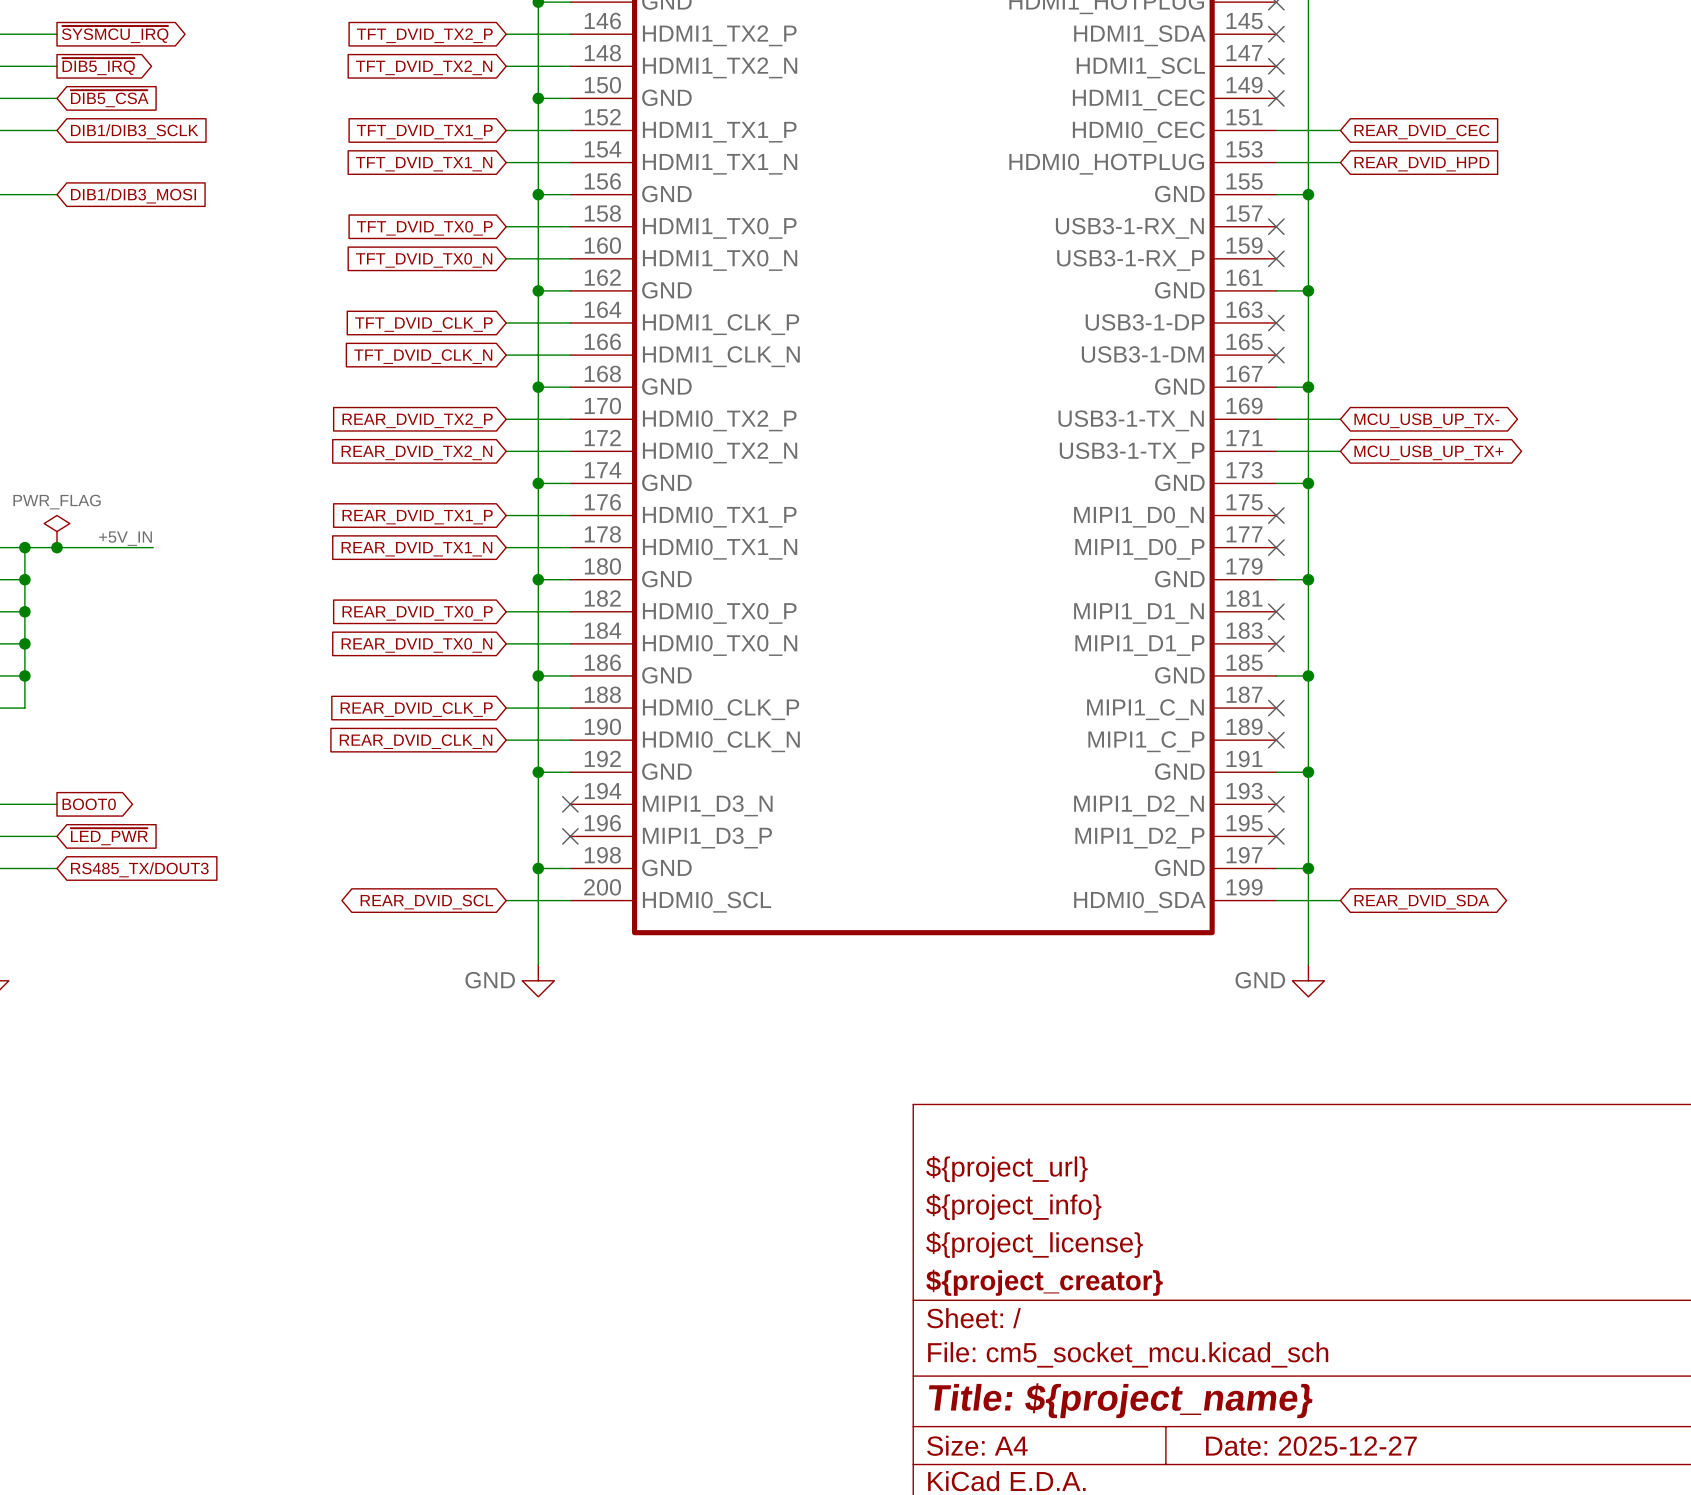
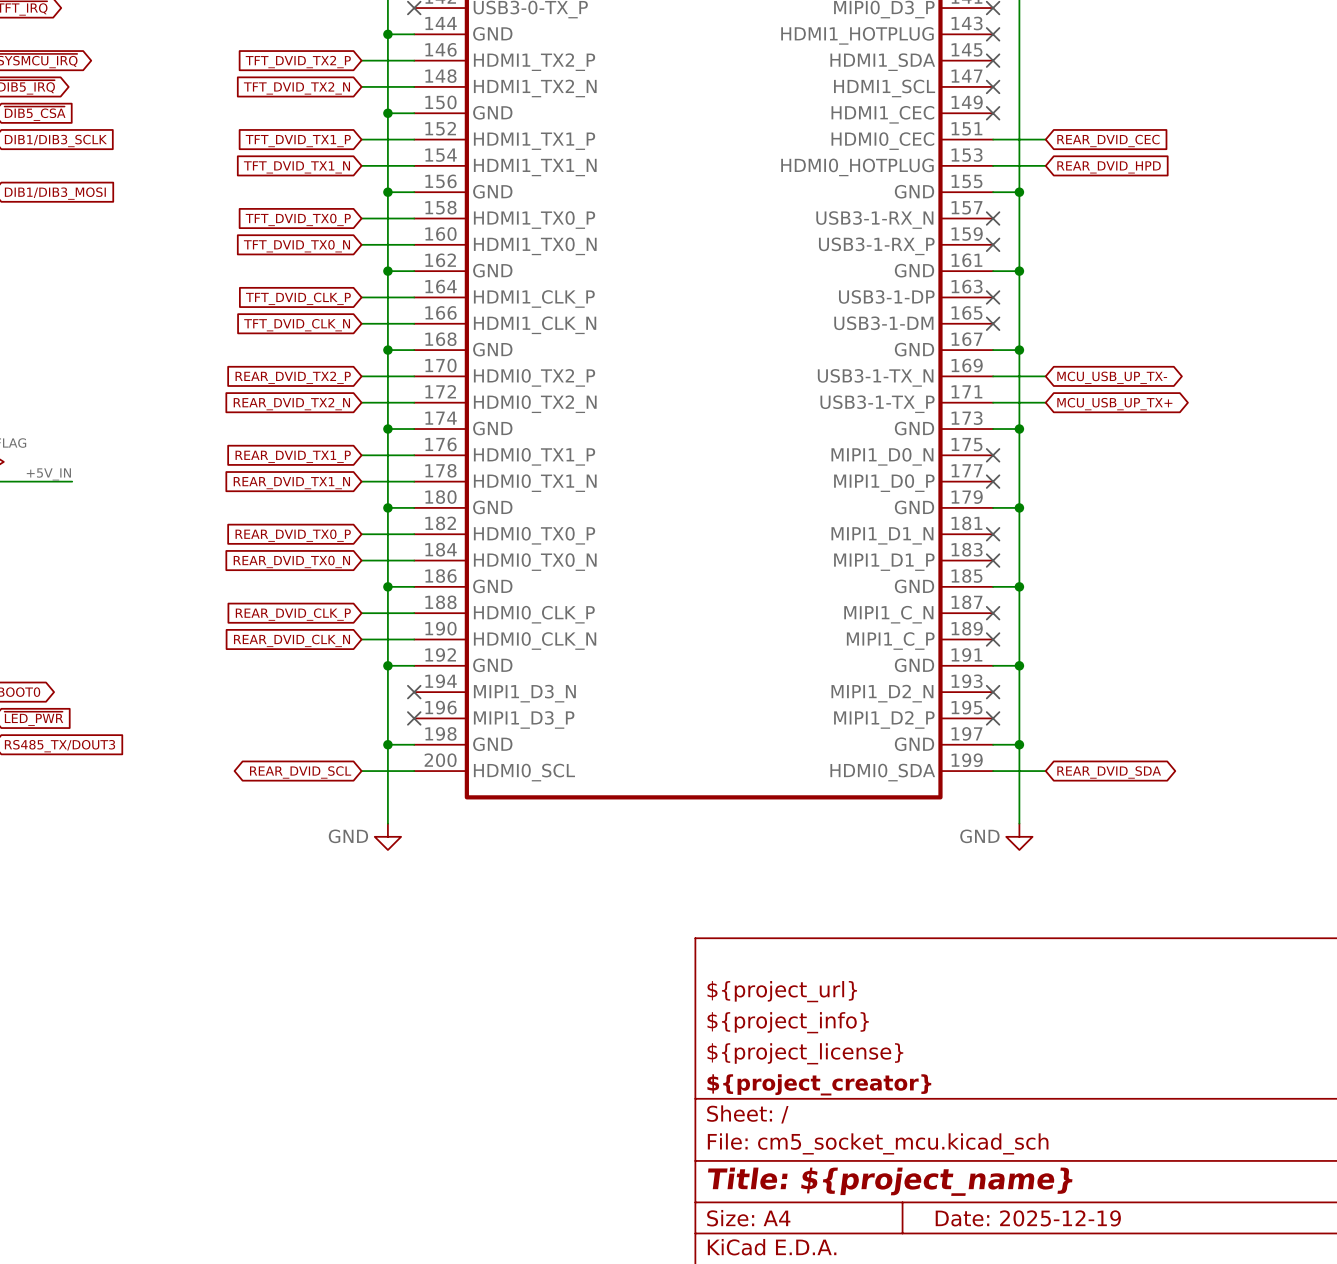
title block: Date: 2025-12-27 (1311, 1446) -> Date: 2025-12-19 (1028, 1218)

